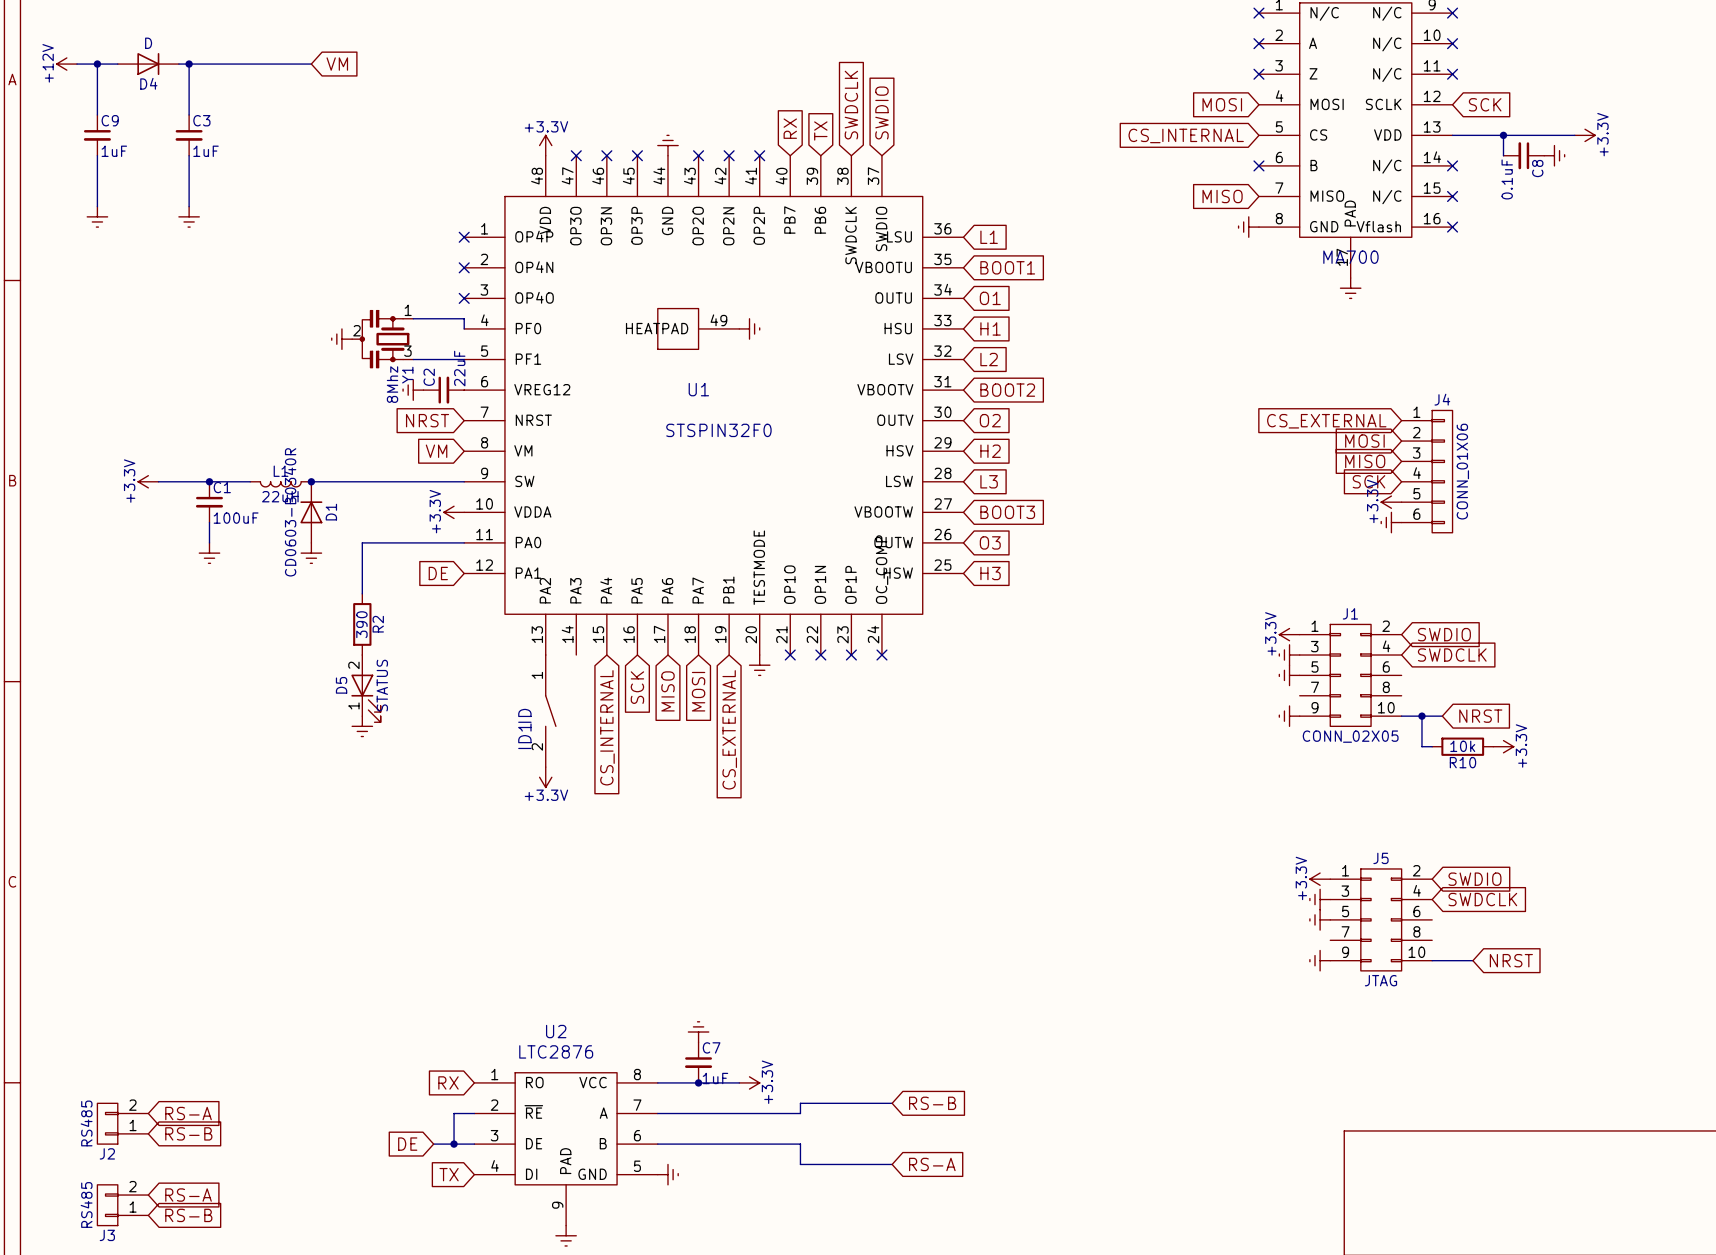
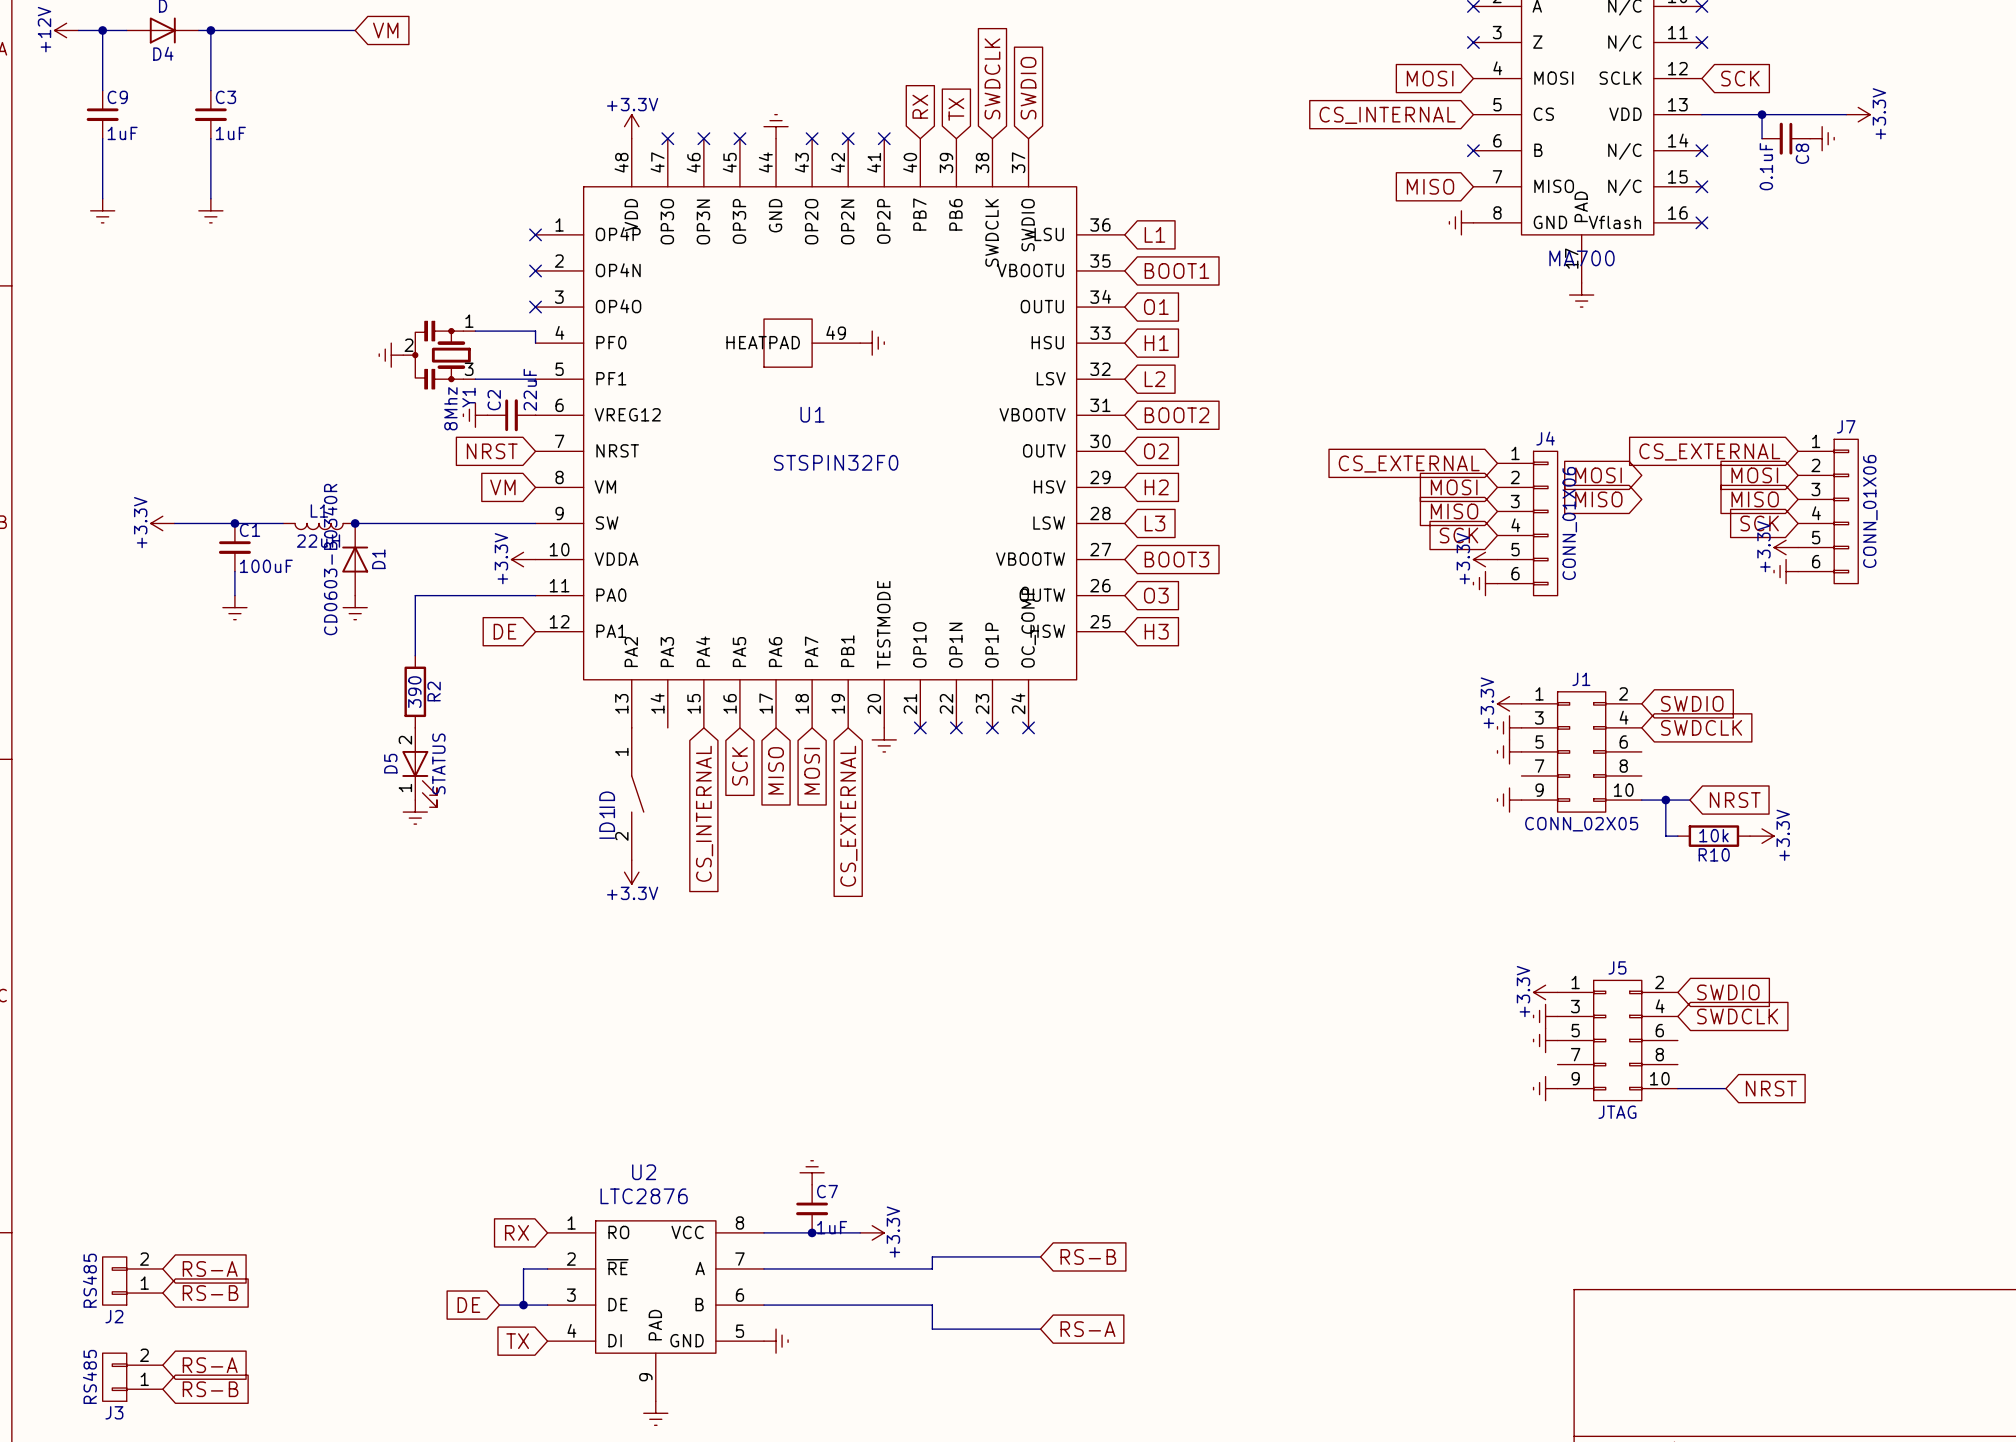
global label: CS_EXTERNAL (1326, 421) -> none
global label: none -> CS_EXTERNAL (1709, 452)
global label: none -> CS_EXTERNAL (1409, 464)
global label: none -> MOSI (1754, 475)
global label: none -> MOSI (1454, 487)
global label: none -> MISO (1755, 499)
global label: none -> MISO (1454, 511)
J4 position: (1427, 471) -> (1527, 523)
J7: none -> CONN_01X06 (1828, 511)
global label: SCK (1369, 481) -> none
global label: none -> SCK (1759, 523)
global label: none -> SCK (1459, 535)
power symbol: +3.3V (1391, 502) -> none
power symbol: none -> +3.3V (1786, 547)
power symbol: none -> +3.3V (1485, 559)
power symbol: (1391, 522) -> none
power symbol: none -> (1786, 571)
power symbol: none -> (1485, 583)

